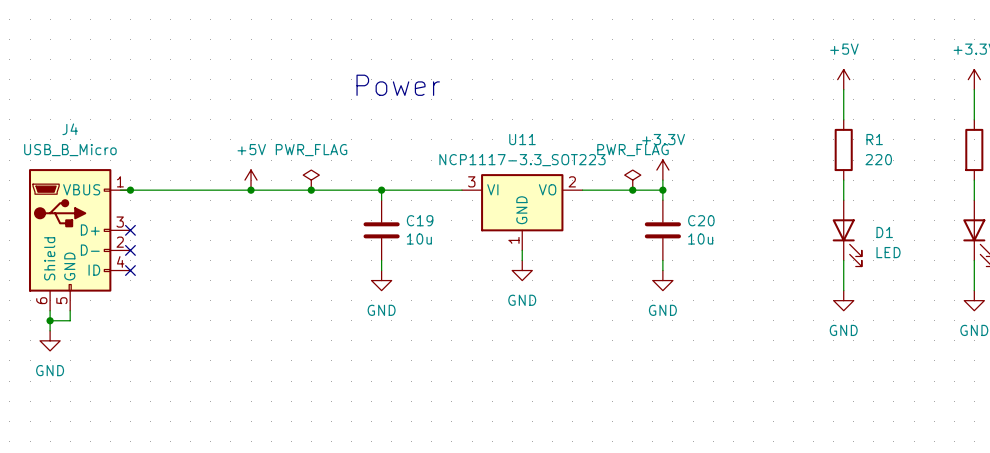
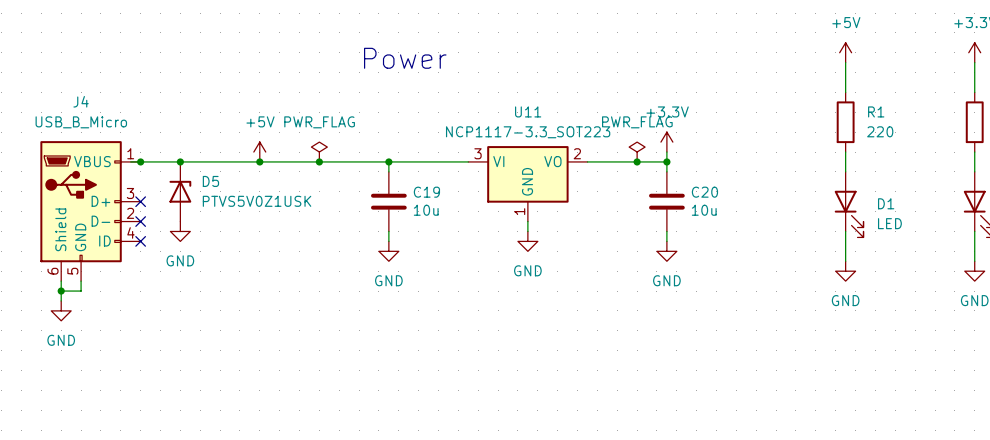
junction: none -> (180, 161)
D5: none -> PTVS5V0Z1USK (180, 191)
power symbol: none -> GND (180, 231)

